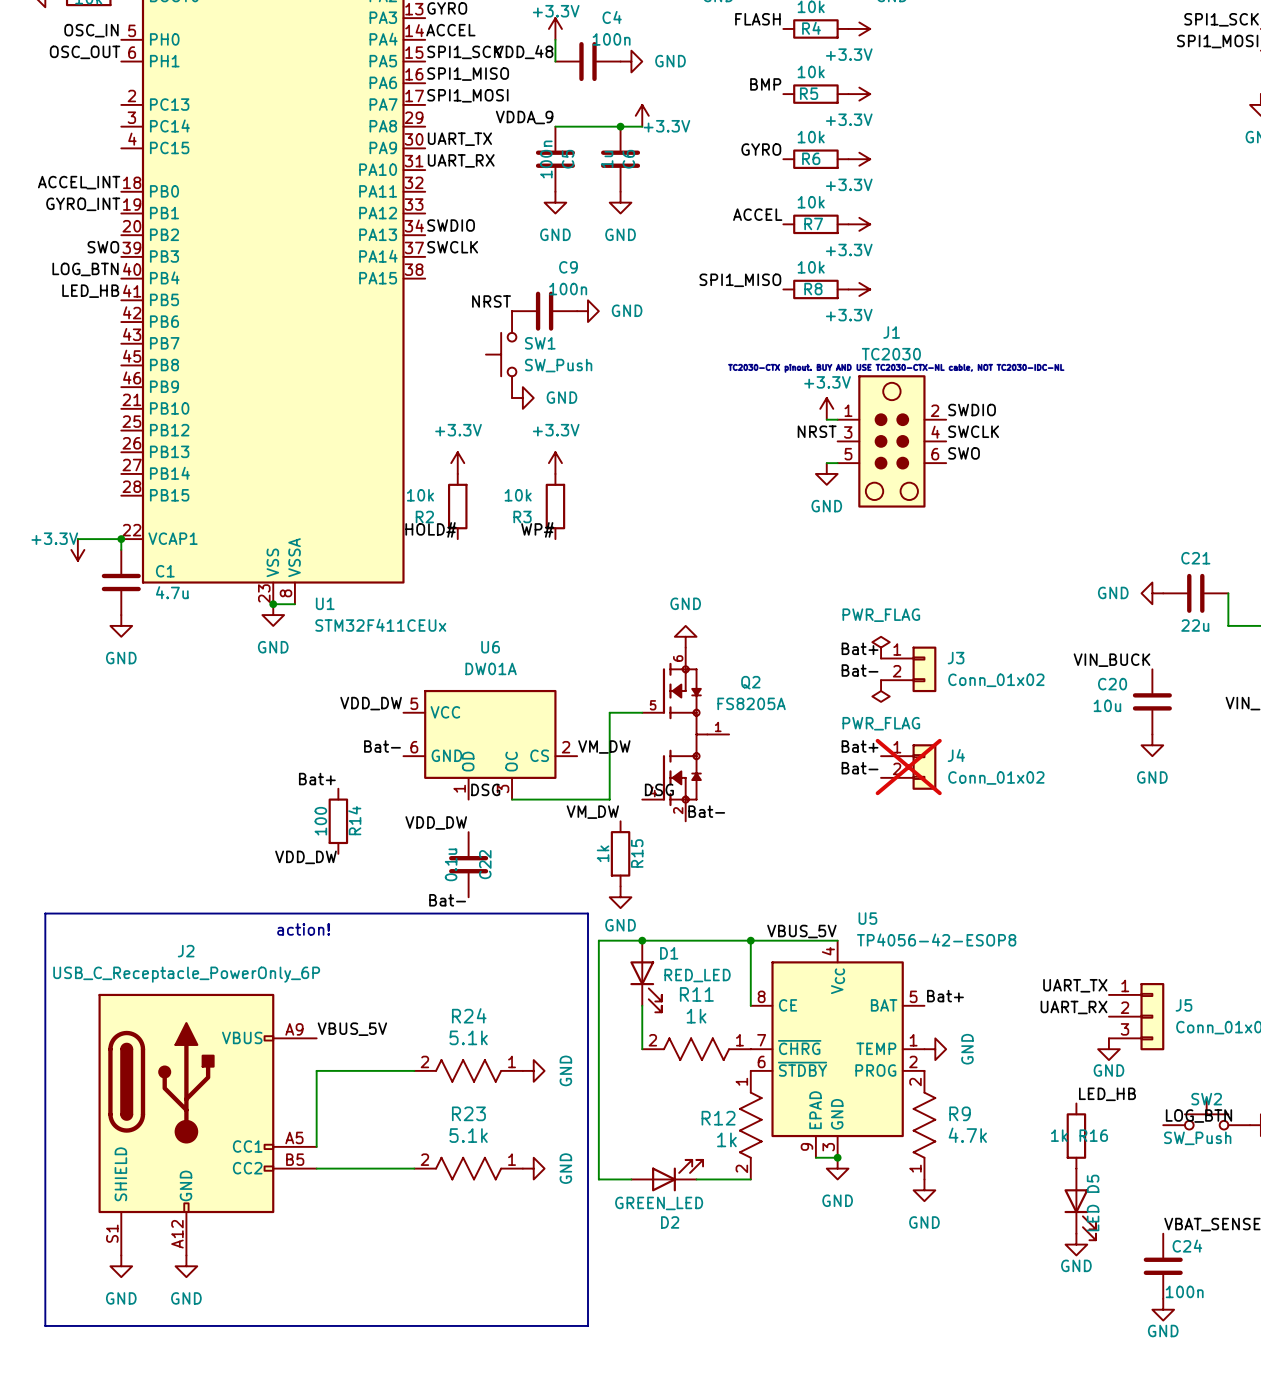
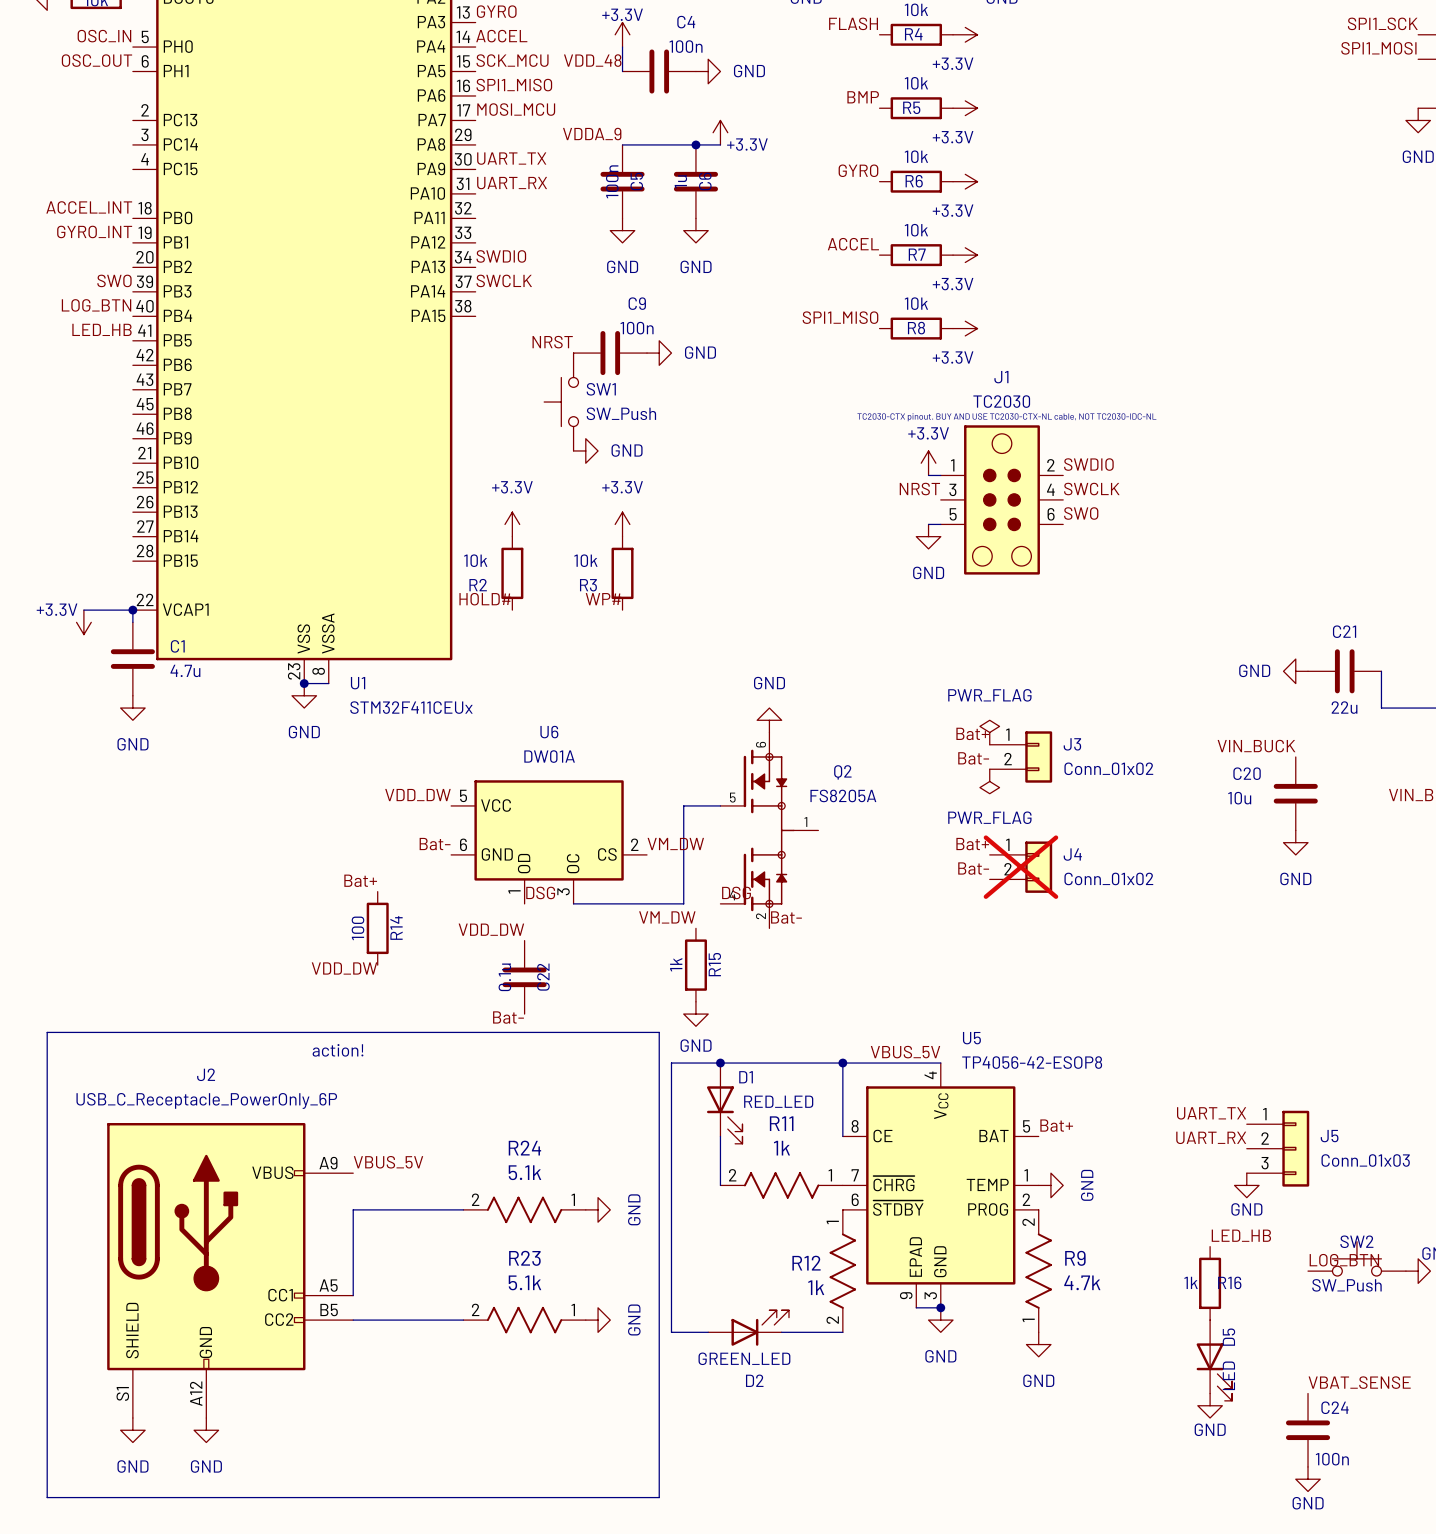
label: SPI1_SCK (464, 52) -> SCK_MCU (512, 60)
label: SPI1_MOSI (467, 95) -> MOSI_MCU (516, 109)

